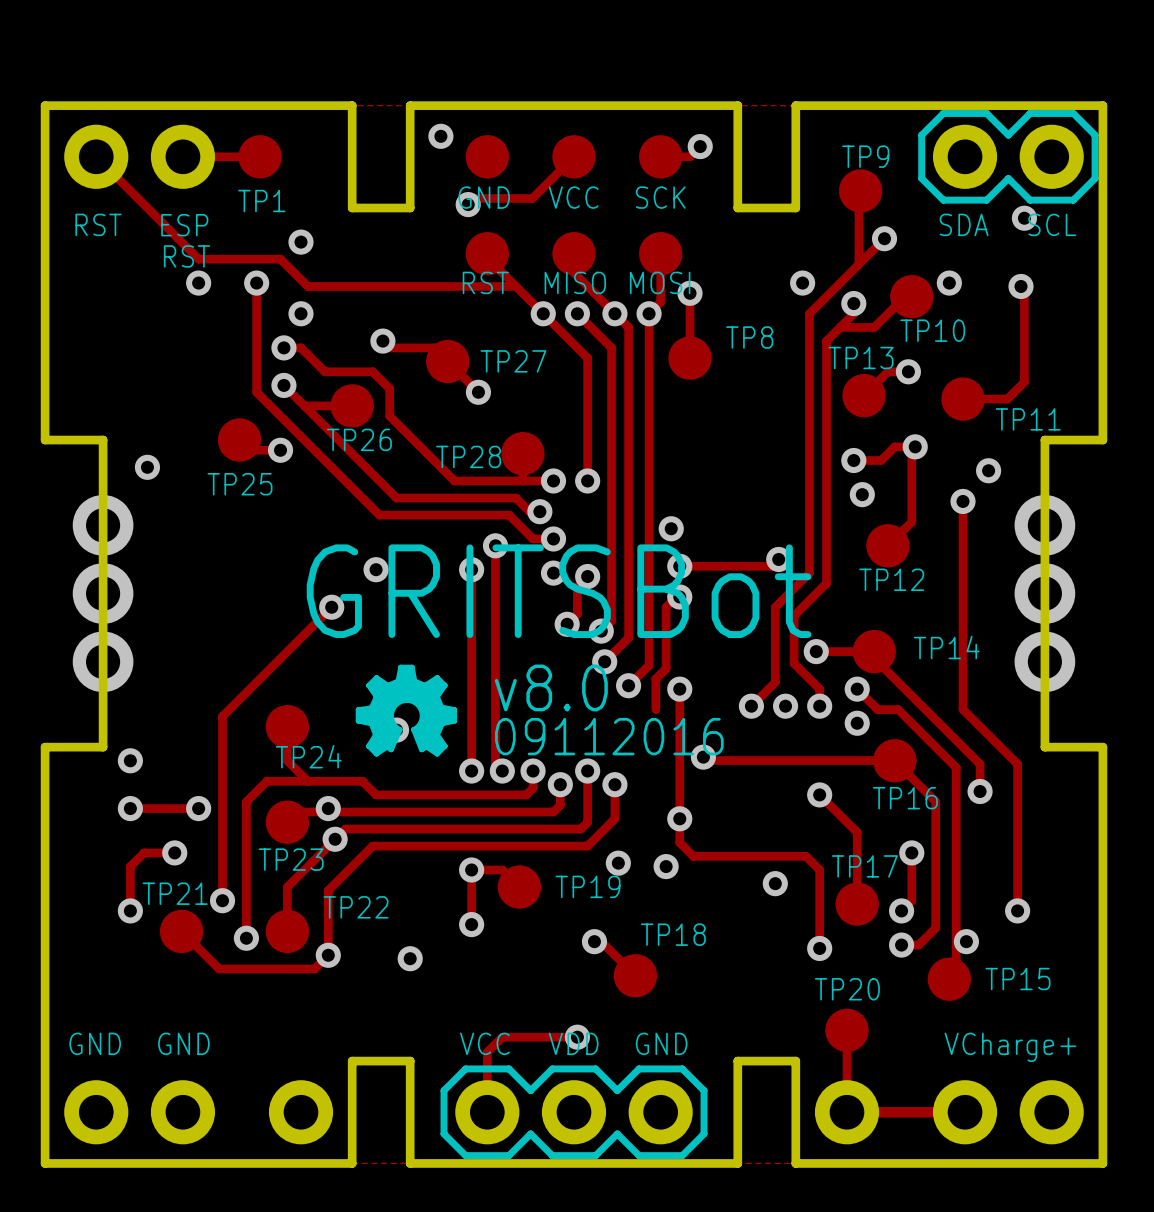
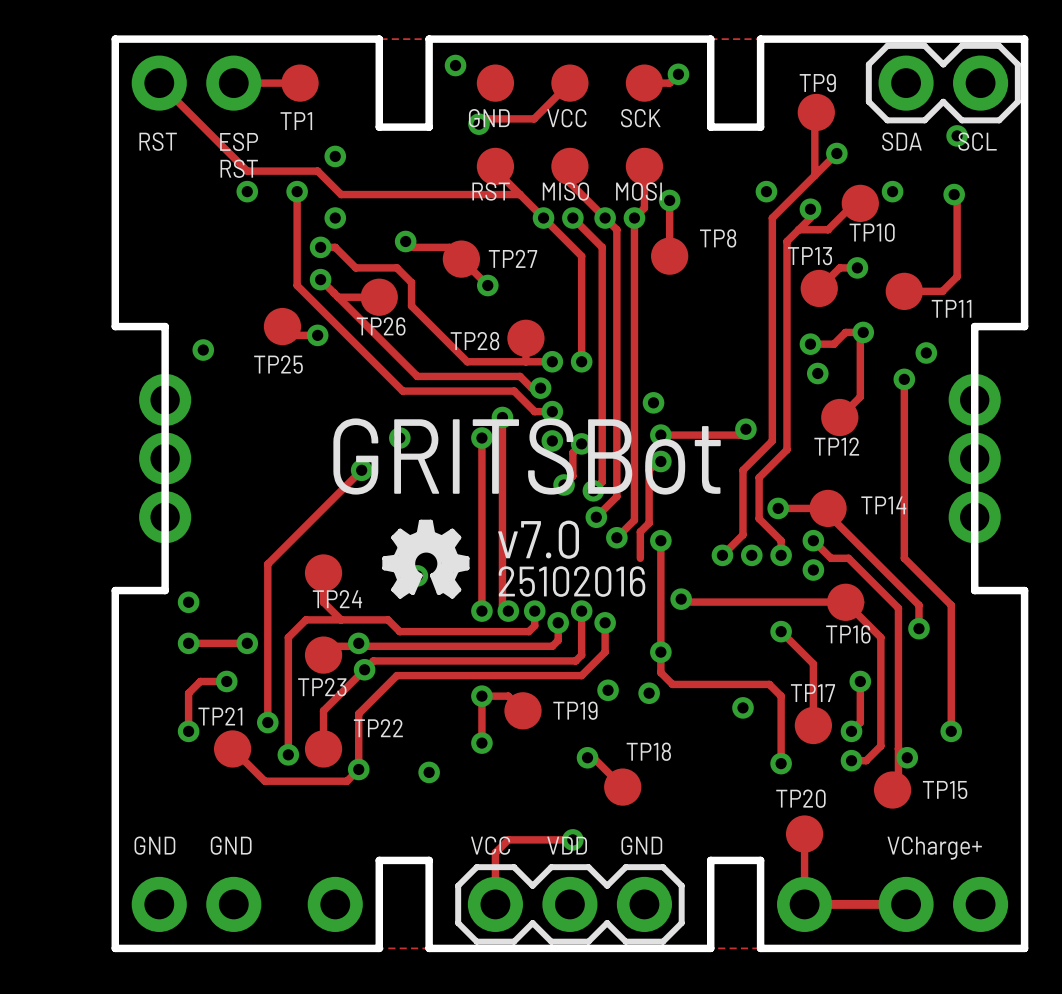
text: v8.0 (551, 687) -> v7.0 (538, 539)
text: 09112016 (609, 736) -> 25102016 (572, 581)

